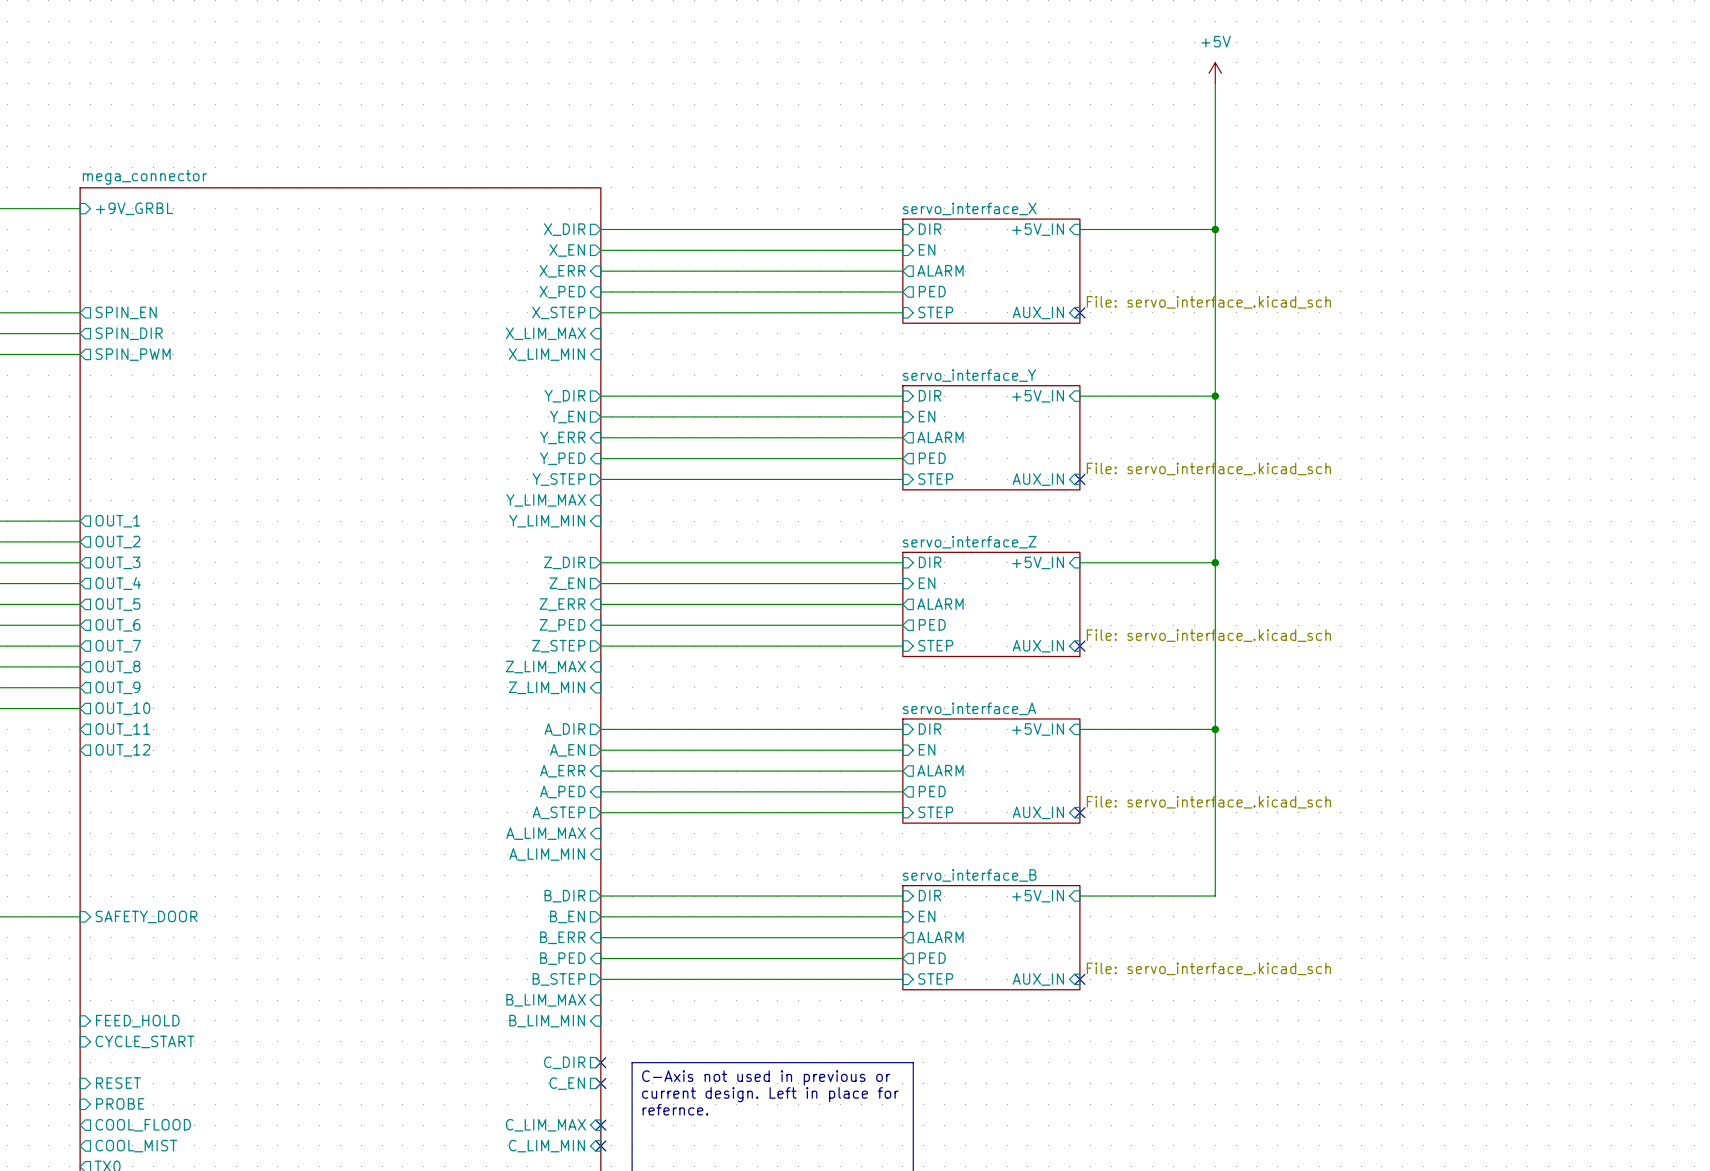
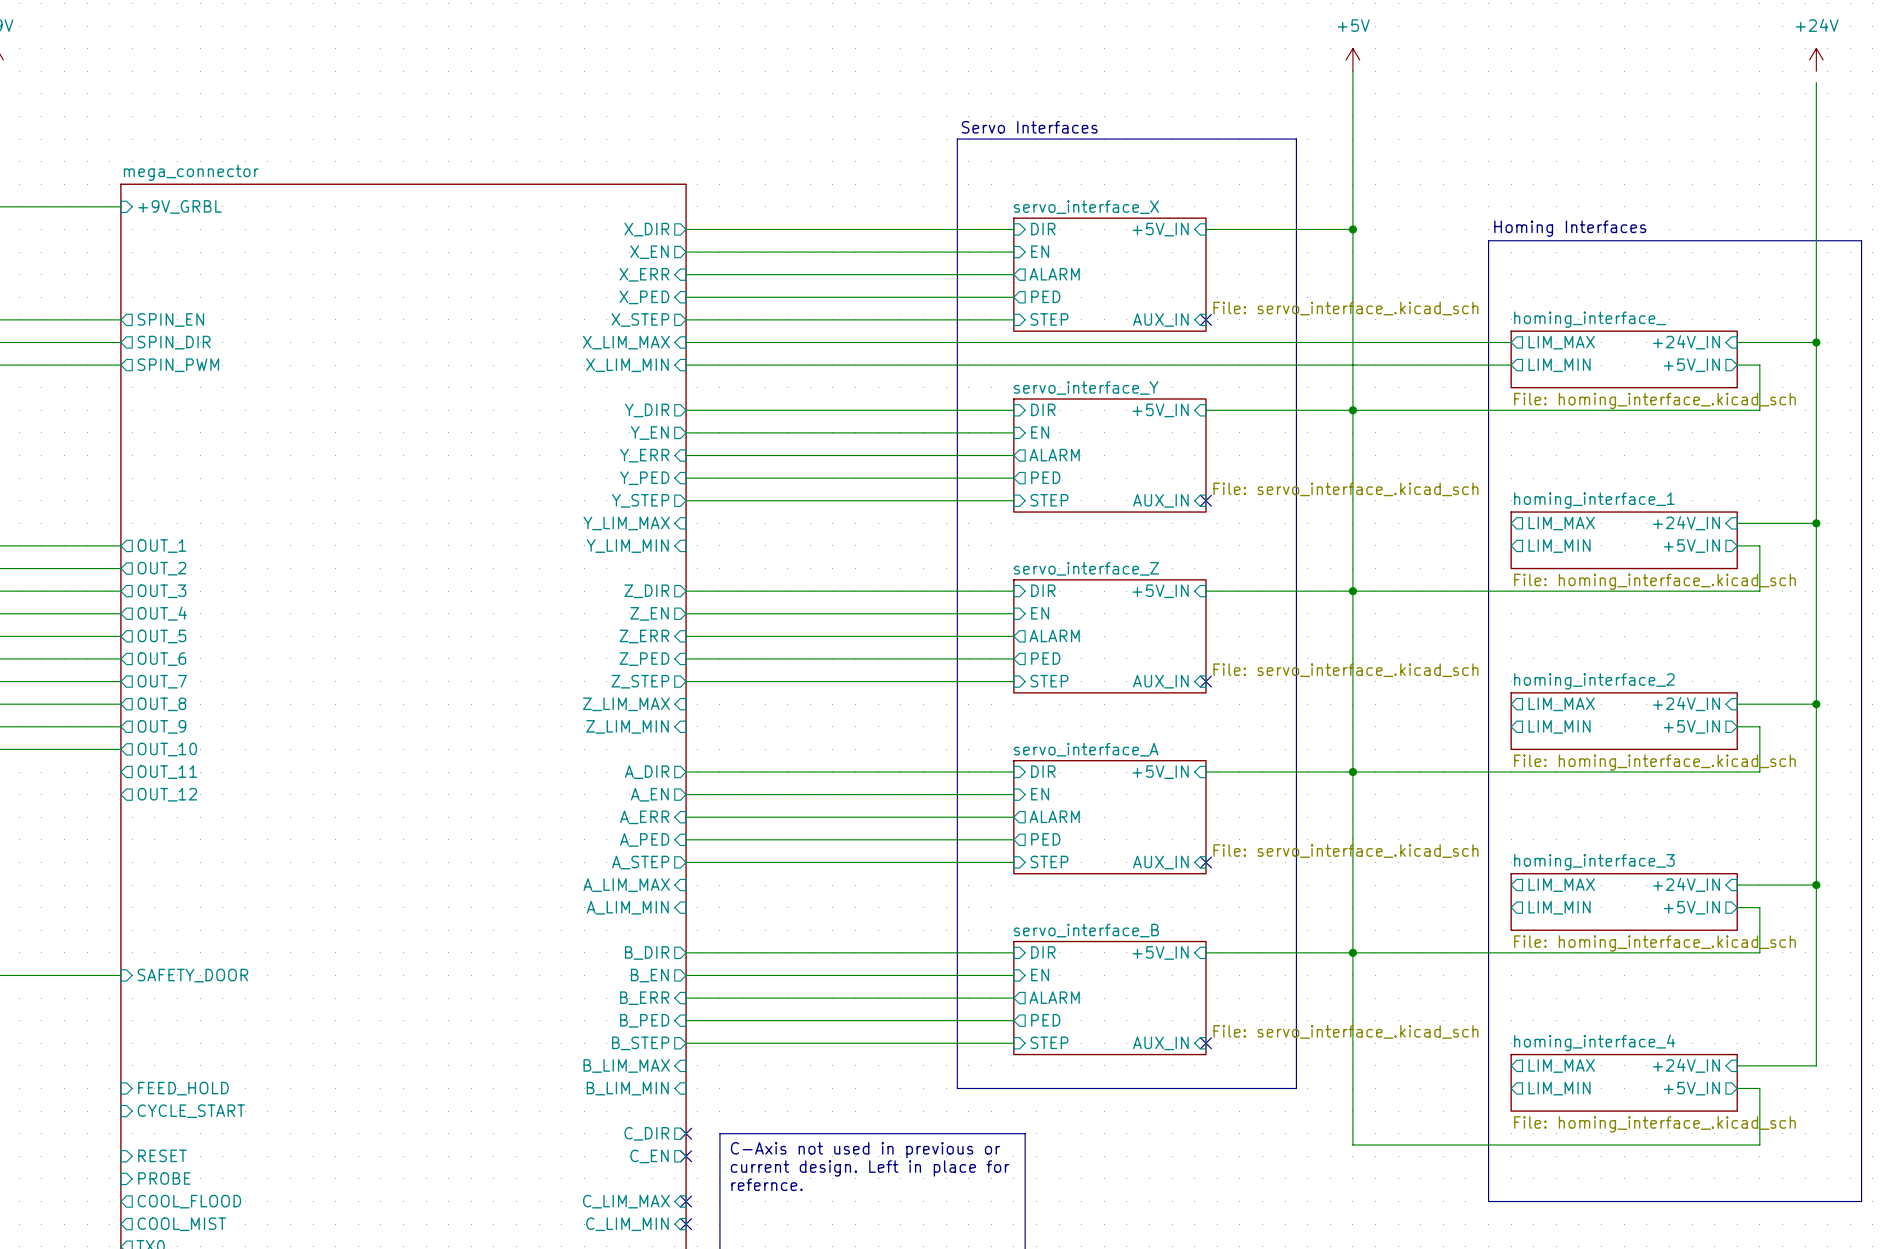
power symbol: none -> +24V (1816, 59)
wire: none -> (1816, 82) (1816, 1065) (1737, 1065)
text: none -> Servo Interfaces (1029, 127)
line: none -> (957, 139) (1296, 139) (1296, 1088) (957, 1088) (957, 139)
text: none -> Homing Interfaces (1570, 228)
line: none -> (1488, 240) (1861, 240) (1861, 1201) (1488, 1201) (1488, 240)
wire: none -> (686, 342) (1511, 342)
sheet pin: none -> LIM_MAX (1561, 342)
sheet pin: none -> +24V_IN (1686, 342)
wire: none -> (1737, 342) (1816, 342)
junction: none -> (1816, 342)
sheet homing_interface_: none -> File: homing_interface_.kicad_sch (1624, 359)
wire: none -> (686, 365) (1511, 365)
sheet pin: none -> LIM_MIN (1559, 365)
sheet pin: none -> +5V_IN (1691, 365)
wire: none -> (1737, 365) (1759, 365) (1759, 410) (1352, 410)
sheet pin: none -> LIM_MAX (1561, 523)
sheet pin: none -> +24V_IN (1686, 523)
wire: none -> (1737, 523) (1816, 523)
junction: none -> (1816, 523)
sheet homing_interface_1: none -> File: homing_interface_.kicad_sch (1624, 540)
sheet pin: none -> LIM_MIN (1559, 546)
sheet pin: none -> +5V_IN (1691, 546)
wire: none -> (1737, 545) (1759, 545) (1759, 591) (1352, 591)
sheet pin: none -> +24V_IN (1686, 704)
wire: none -> (1737, 704) (1816, 704)
junction: none -> (1816, 704)
sheet pin: none -> LIM_MAX (1561, 704)
sheet homing_interface_2: none -> File: homing_interface_.kicad_sch (1624, 721)
sheet pin: none -> LIM_MIN (1559, 726)
sheet pin: none -> +5V_IN (1691, 726)
wire: none -> (1737, 726) (1759, 726) (1759, 772) (1352, 772)
sheet pin: none -> LIM_MAX (1561, 885)
sheet pin: none -> +24V_IN (1686, 884)
wire: none -> (1737, 885) (1816, 885)
junction: none -> (1816, 885)
sheet homing_interface_3: none -> File: homing_interface_.kicad_sch (1624, 901)
sheet pin: none -> LIM_MIN (1559, 907)
sheet pin: none -> +5V_IN (1691, 907)
wire: none -> (1737, 907) (1759, 907) (1759, 952) (1352, 952) (1352, 1144) (1759, 1144) (1759, 1088) (1737, 1088)
junction: none -> (1352, 952)
sheet pin: none -> LIM_MAX (1561, 1065)
sheet pin: none -> +24V_IN (1686, 1065)
sheet homing_interface_4: none -> File: homing_interface_.kicad_sch (1624, 1082)
sheet pin: none -> LIM_MIN (1559, 1088)
sheet pin: none -> +5V_IN (1691, 1088)

